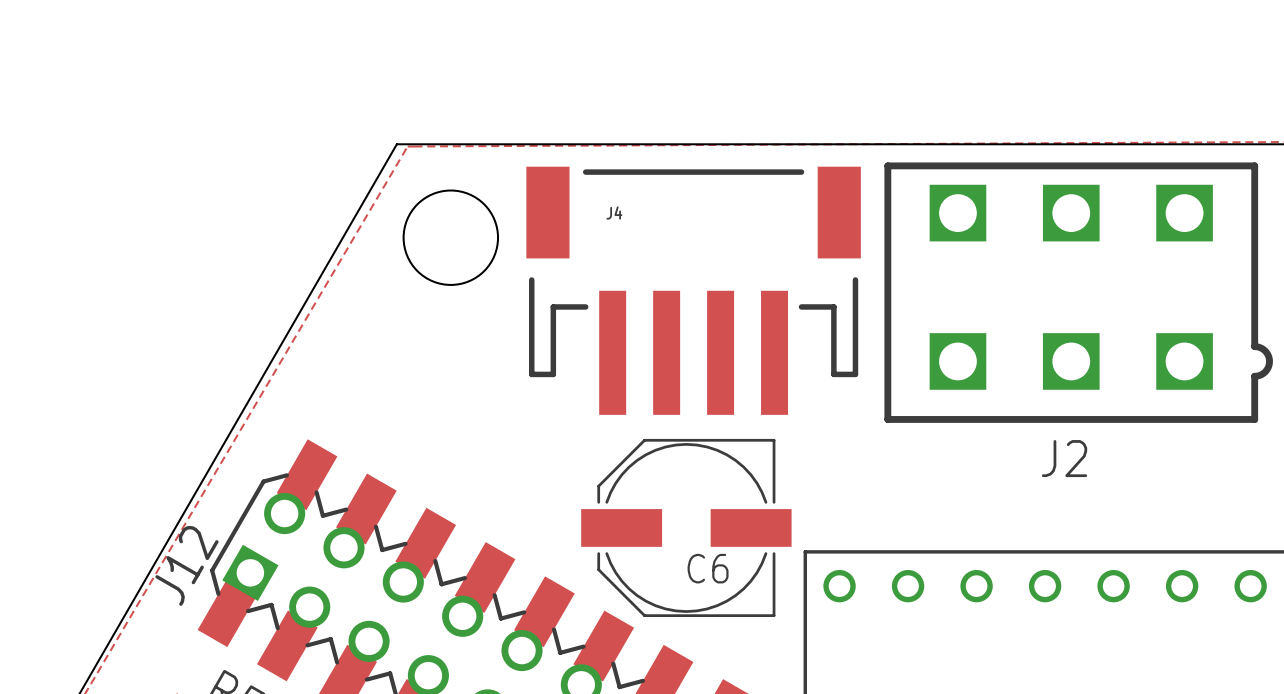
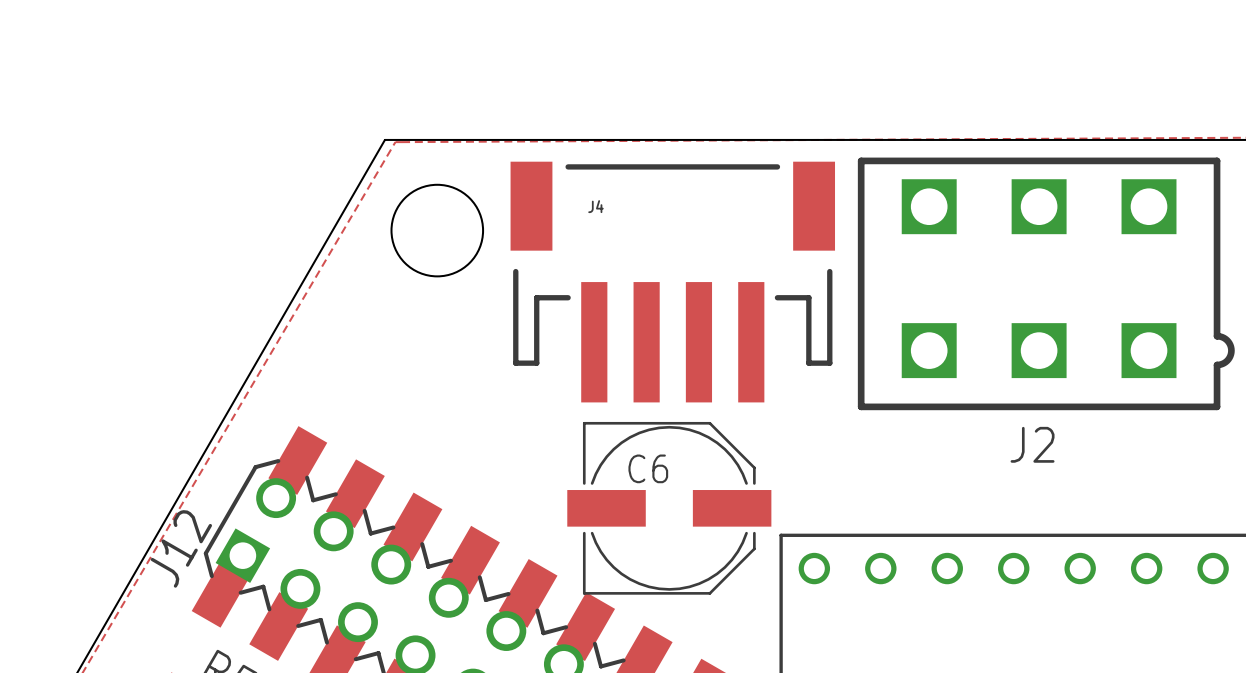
C6 rotation: 0° (686, 527) -> 180° (669, 508)

